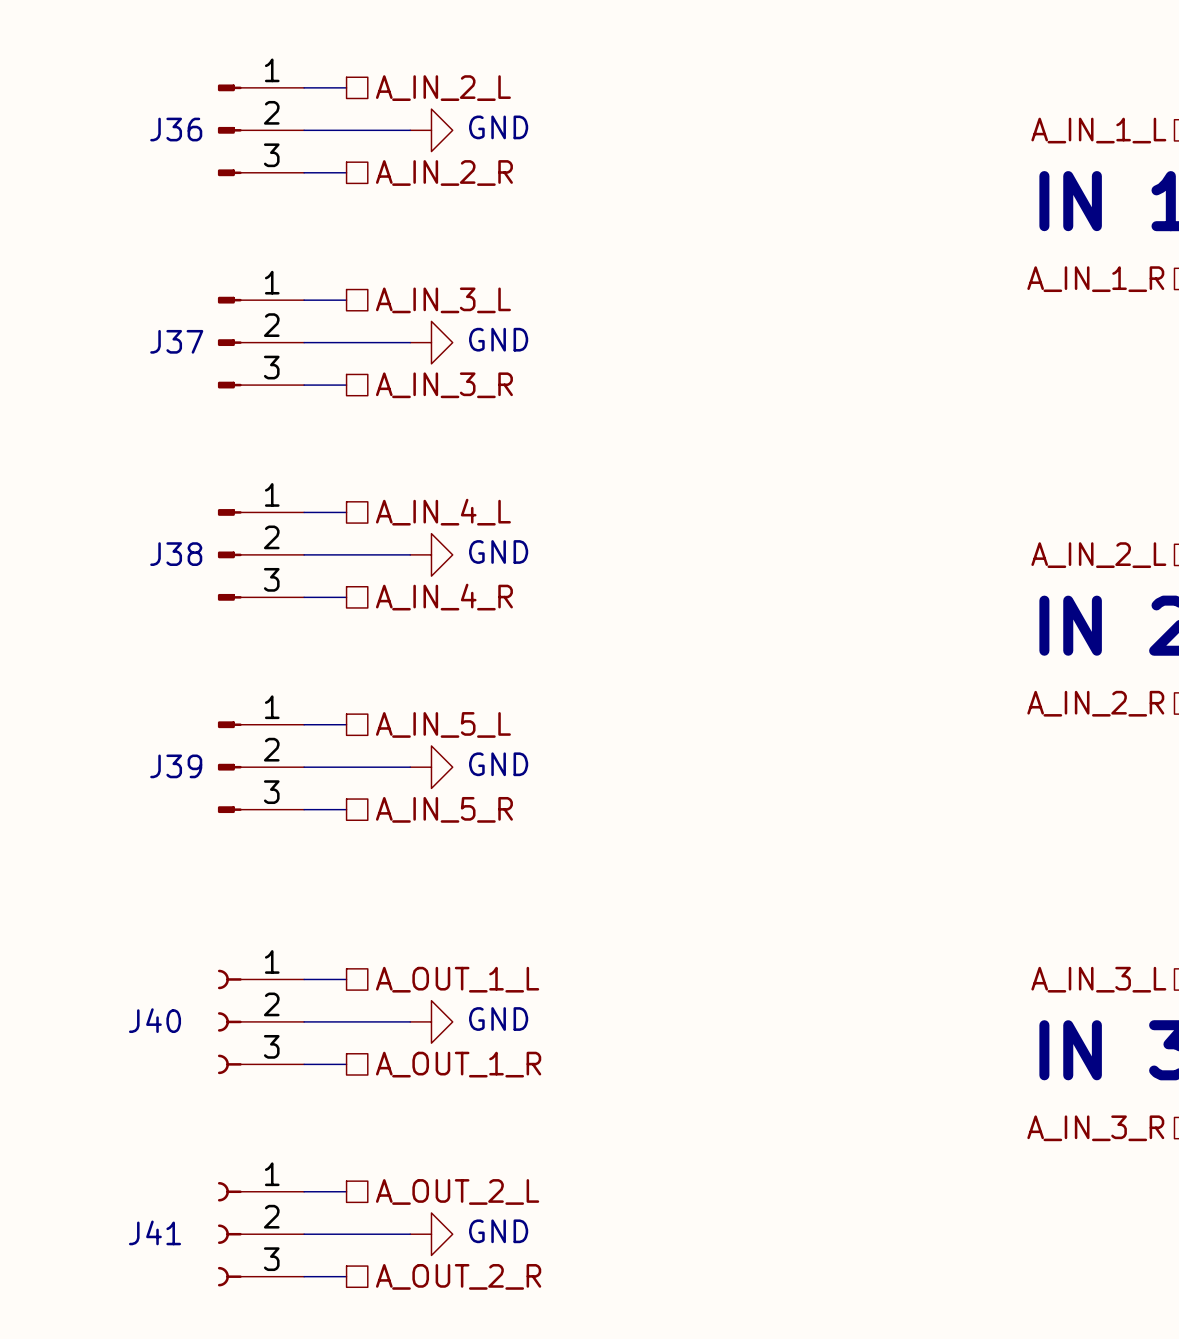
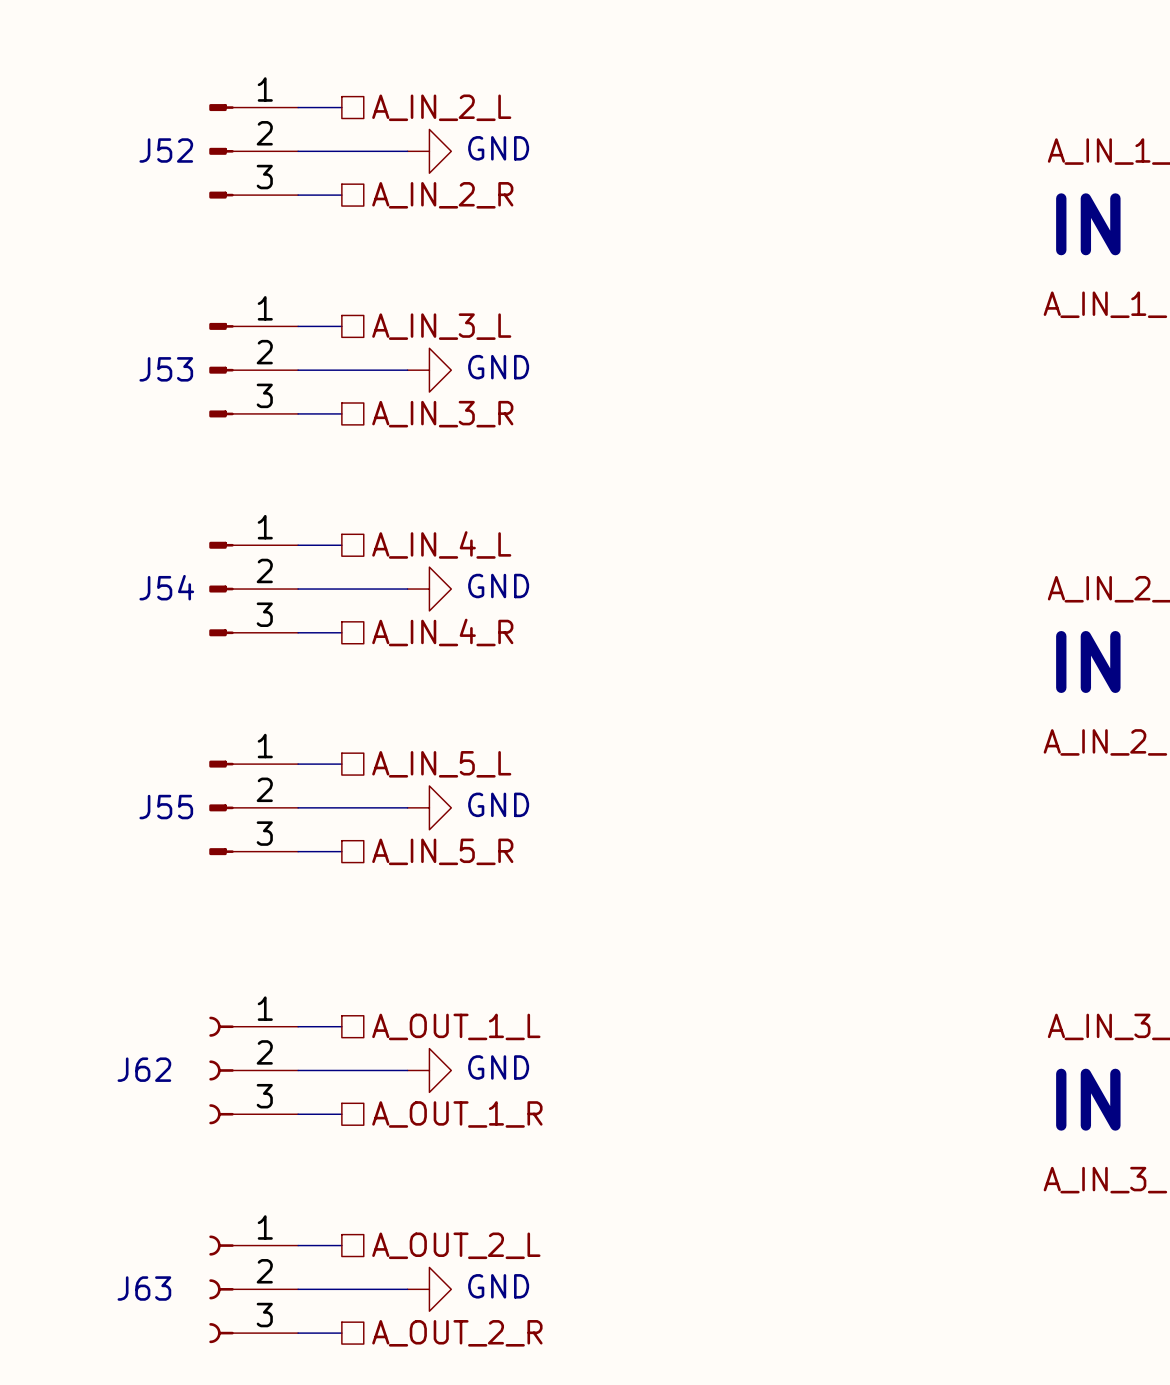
J36 name: J36 (176, 129) -> J52 (166, 150)
J37 name: J37 (176, 341) -> J53 (166, 369)
J38 name: J38 (176, 554) -> J54 (166, 587)
J39 name: J39 (176, 766) -> J55 (166, 807)
J40 name: J40 (155, 1020) -> J62 (144, 1069)
J41 name: J41 (155, 1232) -> J63 (144, 1288)

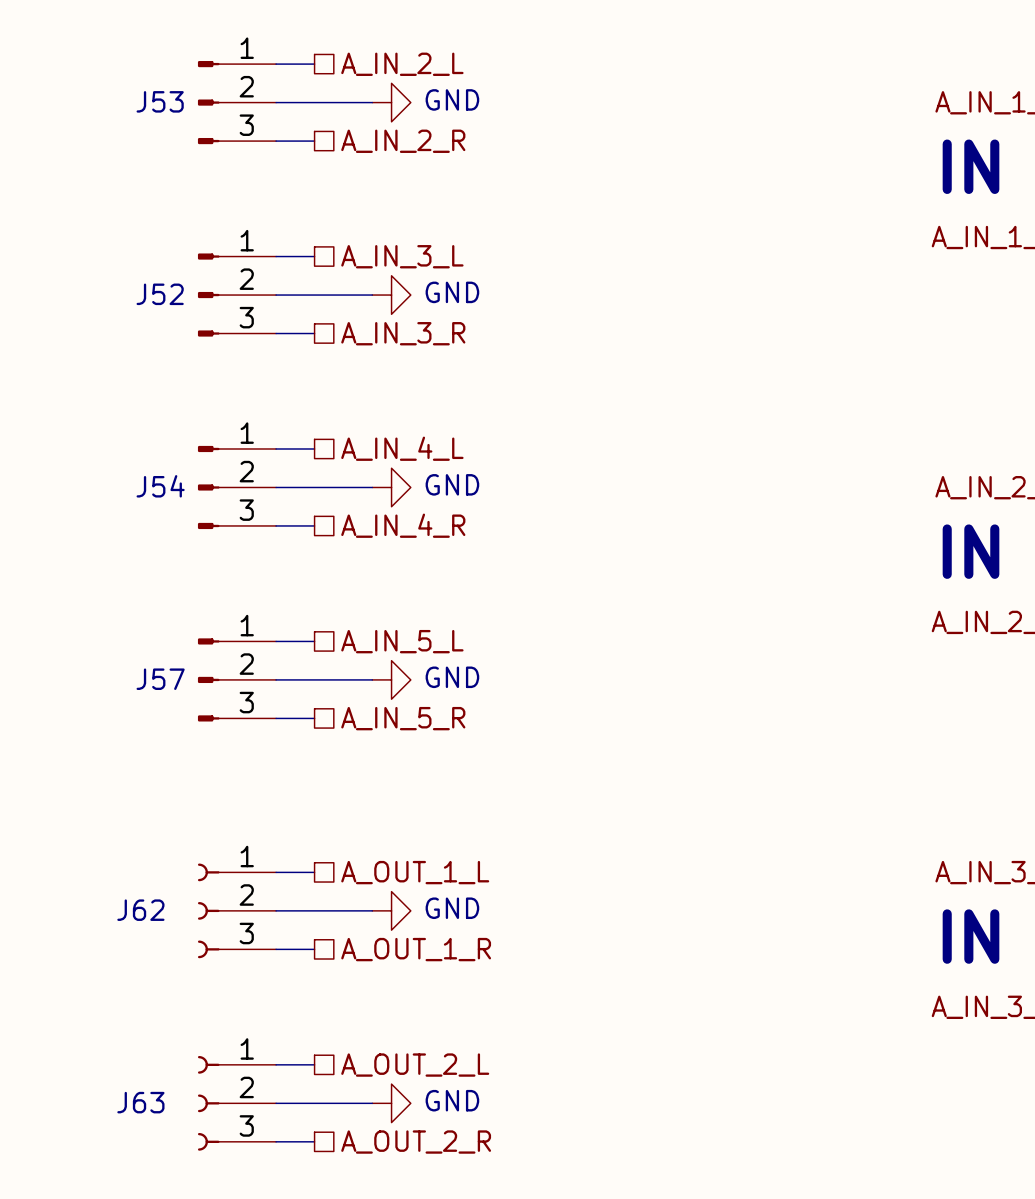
J52 name: J52 (166, 150) -> J53 (160, 101)
J53 name: J53 (166, 369) -> J52 (160, 294)
J55 name: J55 (166, 807) -> J57 (160, 679)

